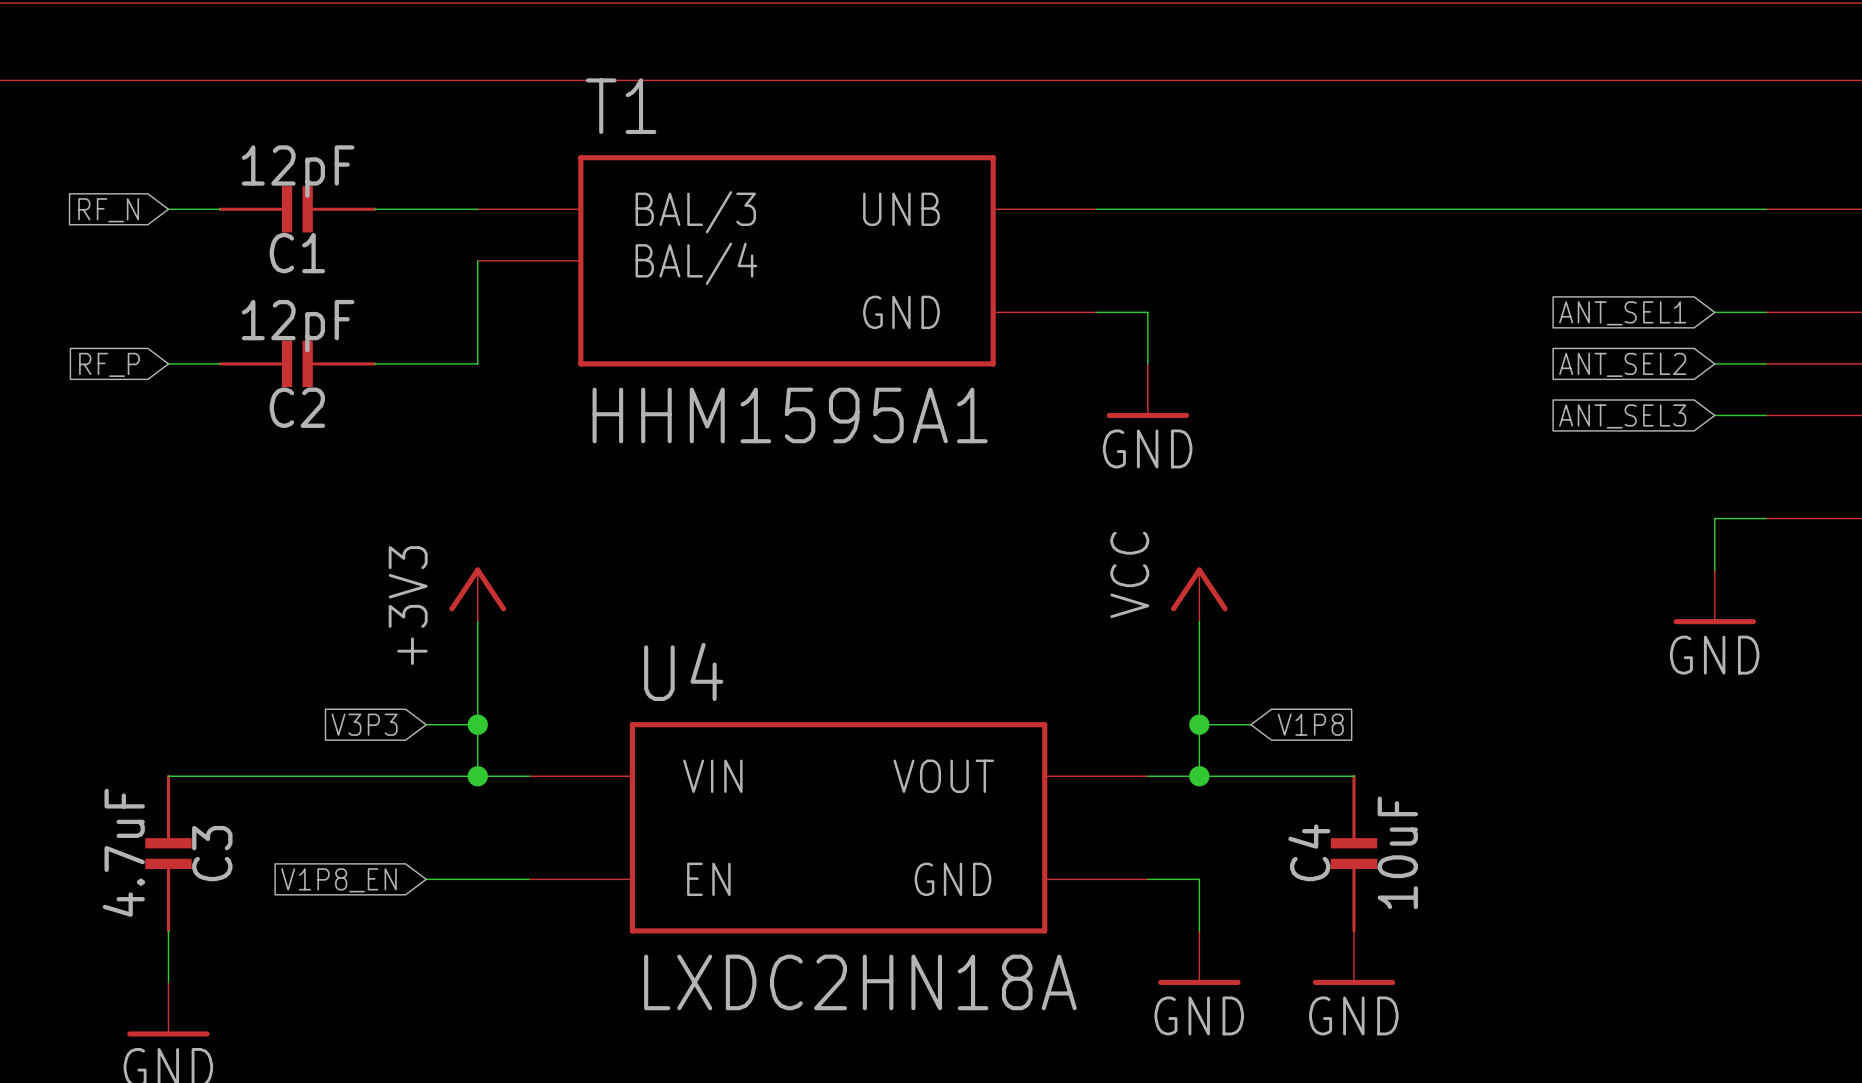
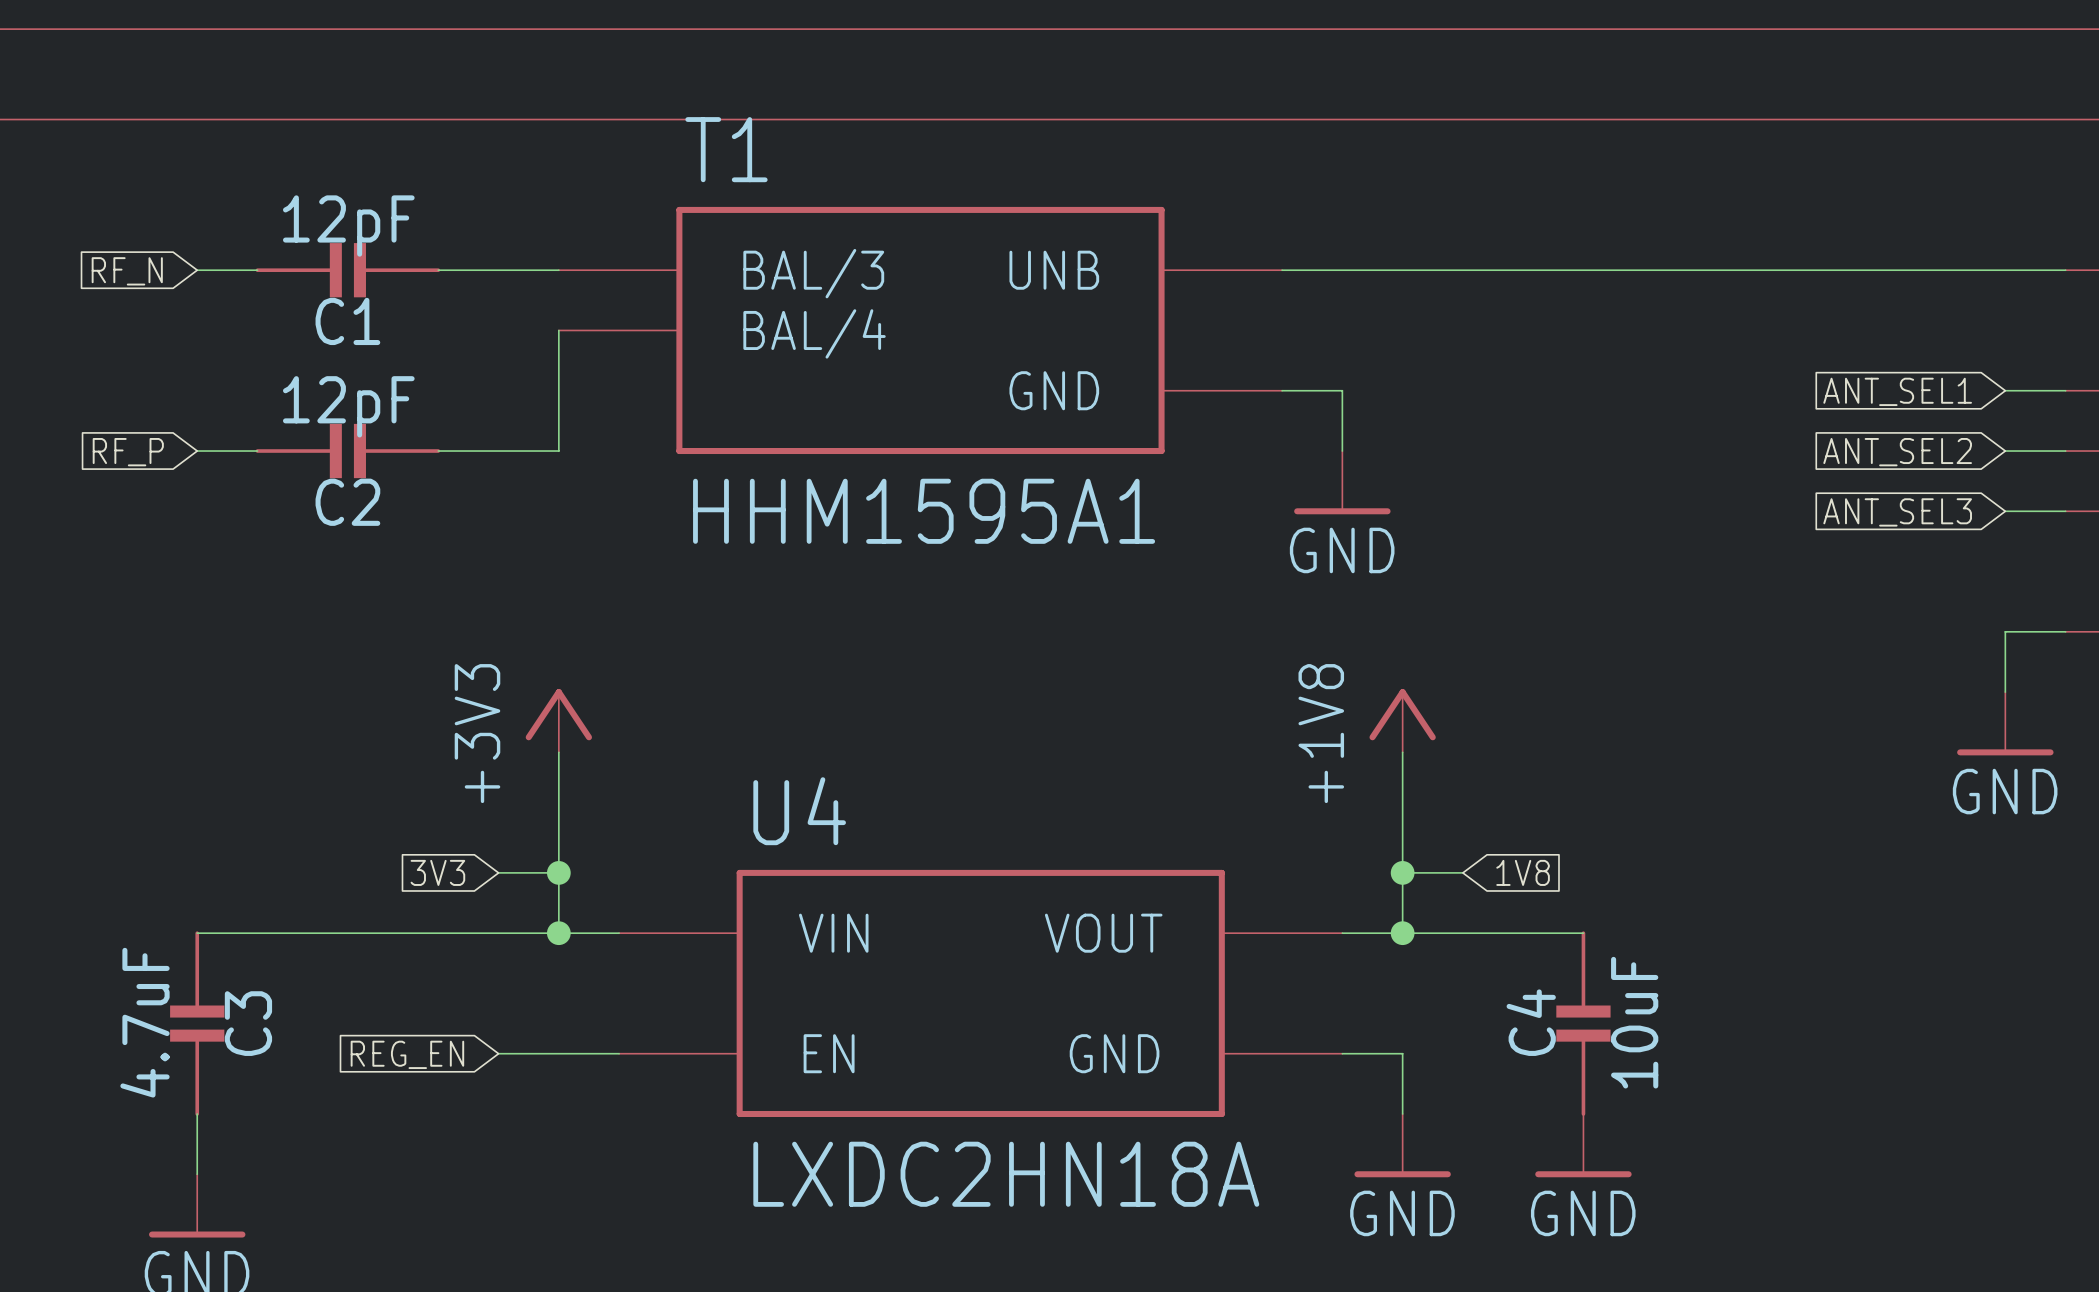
power symbol: VCC (1199, 594) -> +1V8 (1402, 720)
global label: V3P3 (364, 724) -> 3V3 (437, 872)
global label: V1P8 (1310, 724) -> 1V8 (1523, 872)
global label: V1P8_EN (338, 880) -> REG_EN (407, 1054)

